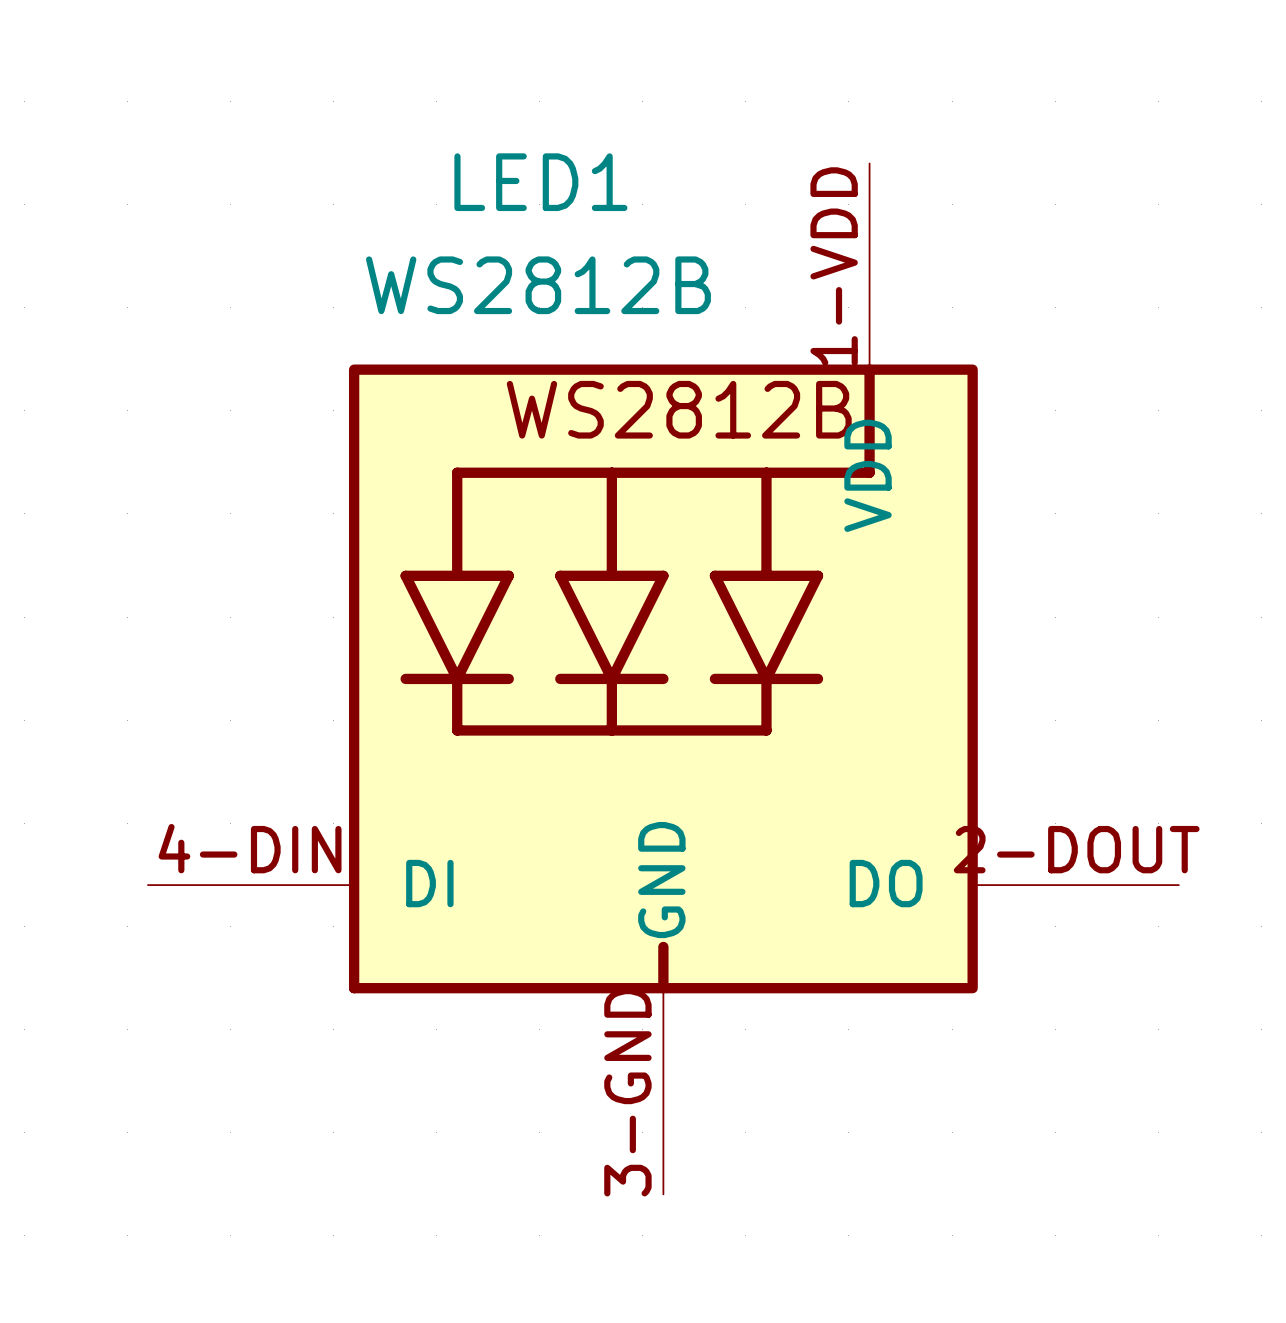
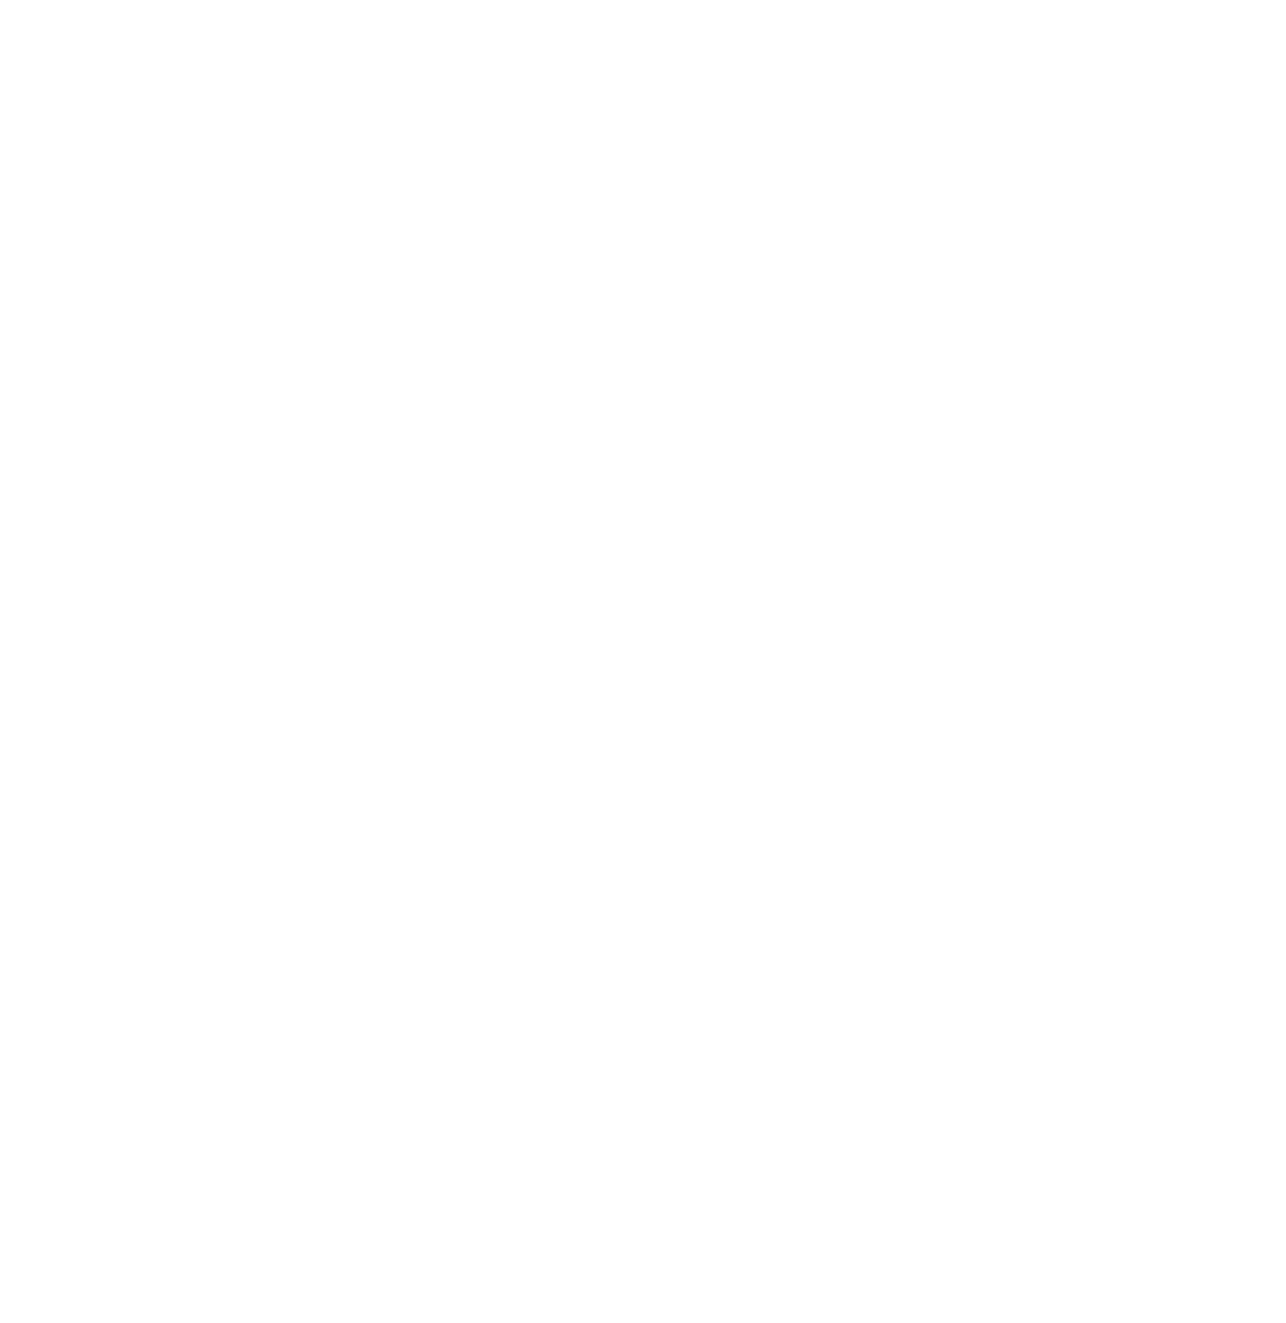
LED1: WS2812B (663, 678) -> none

